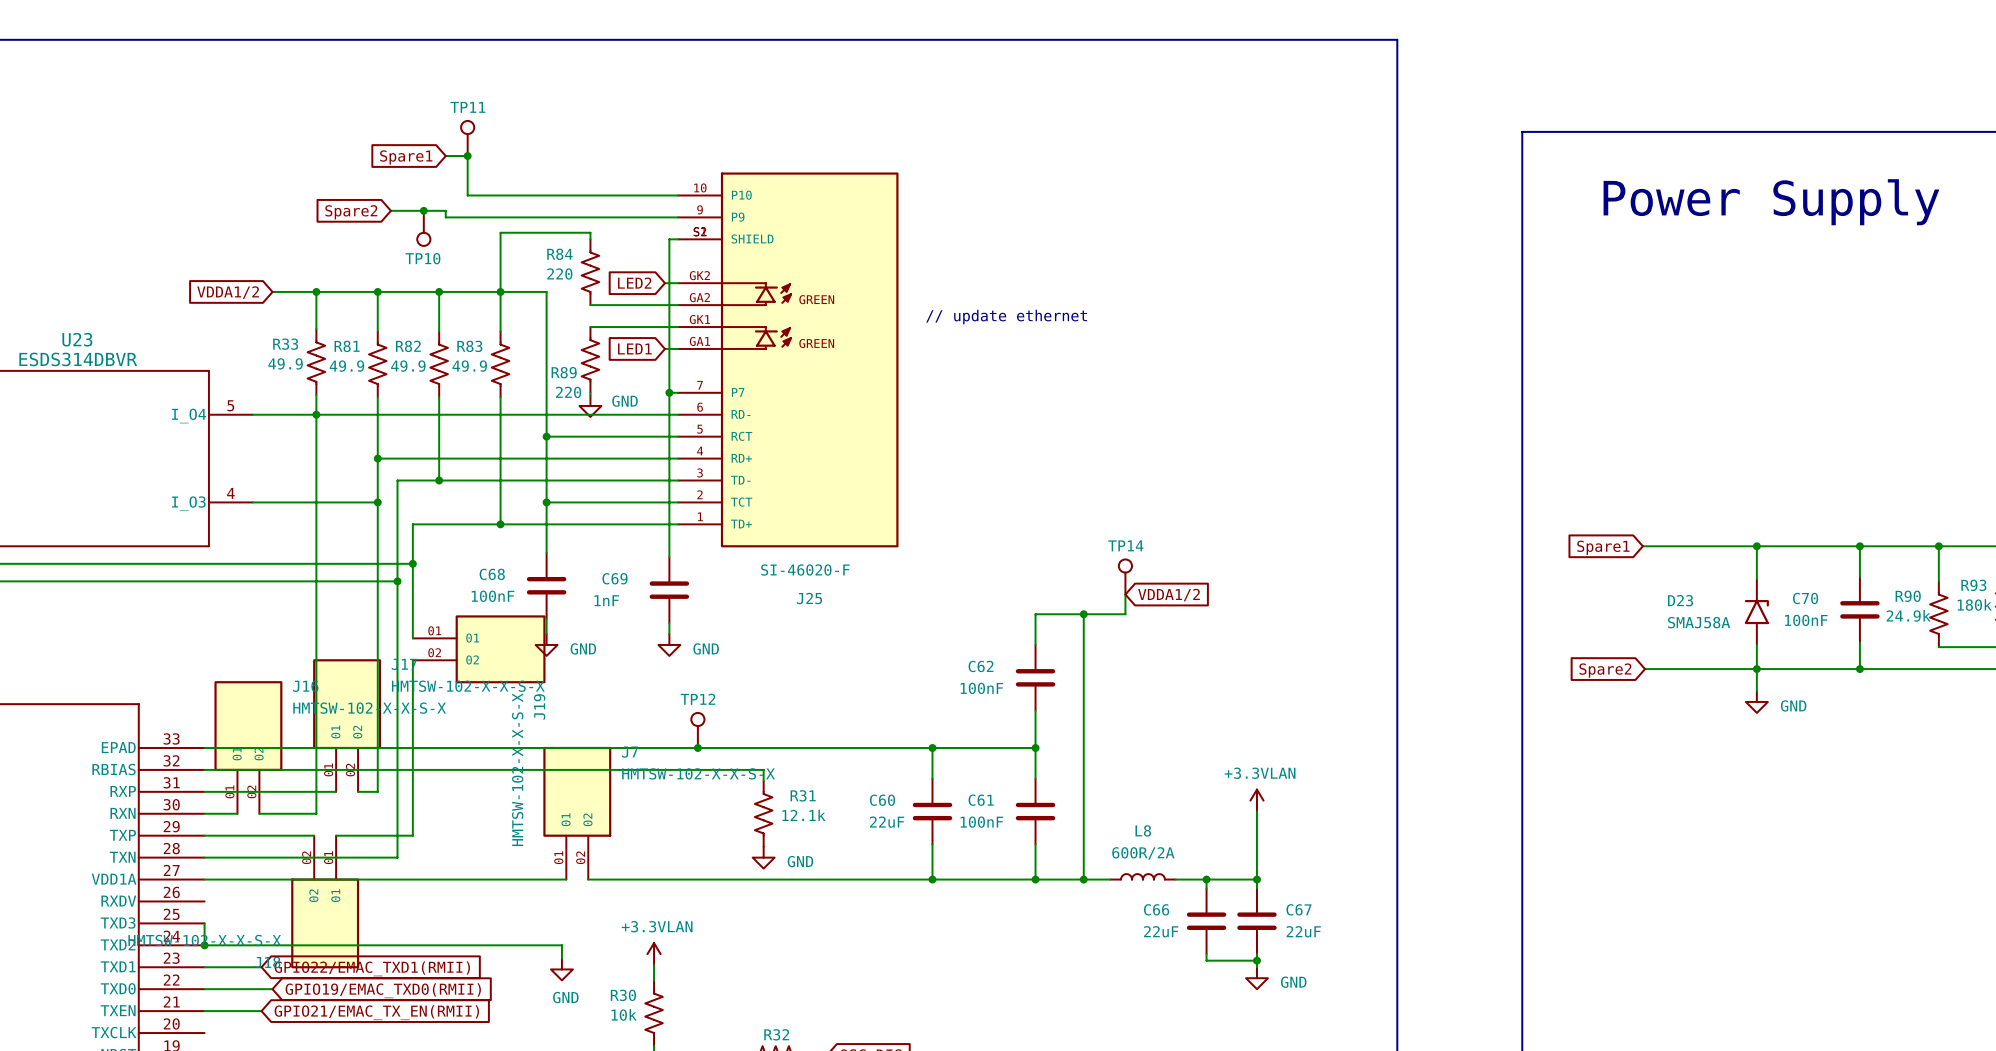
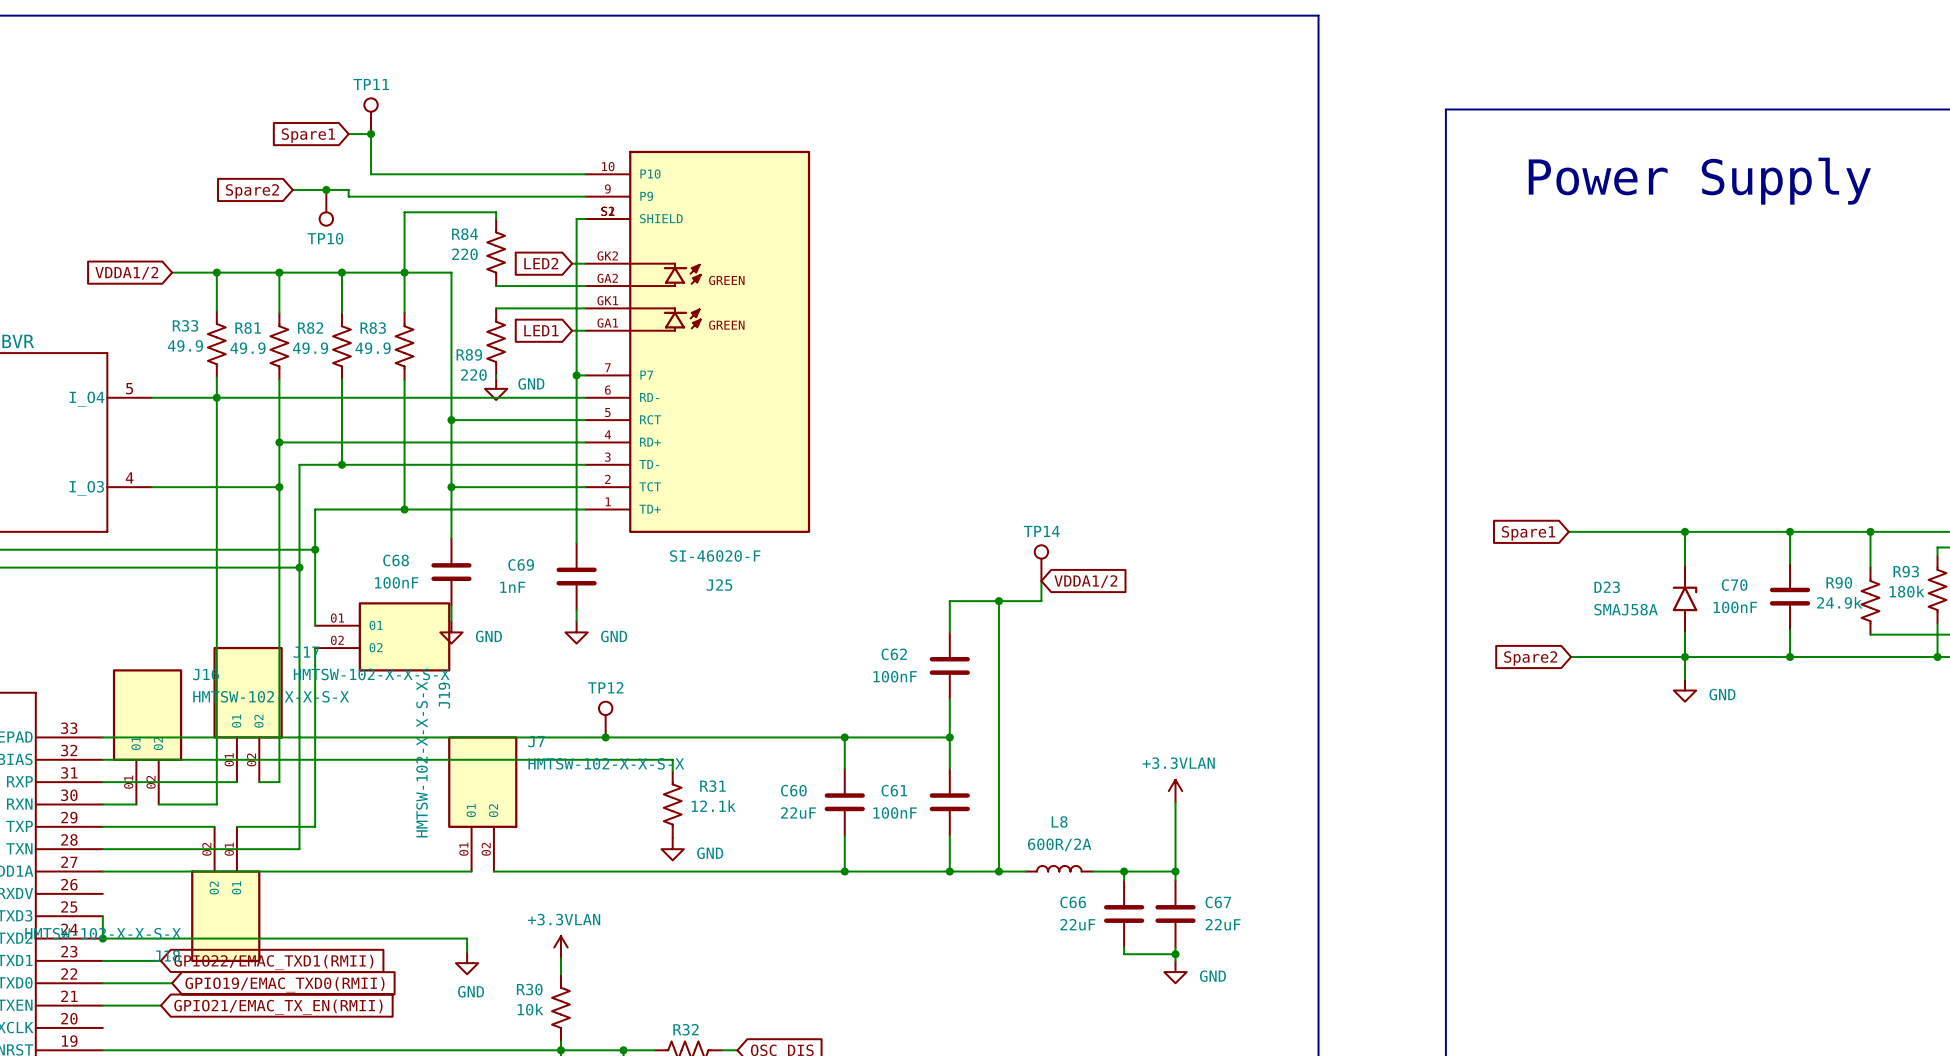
text: // update ethernet (1006, 317) -> none

